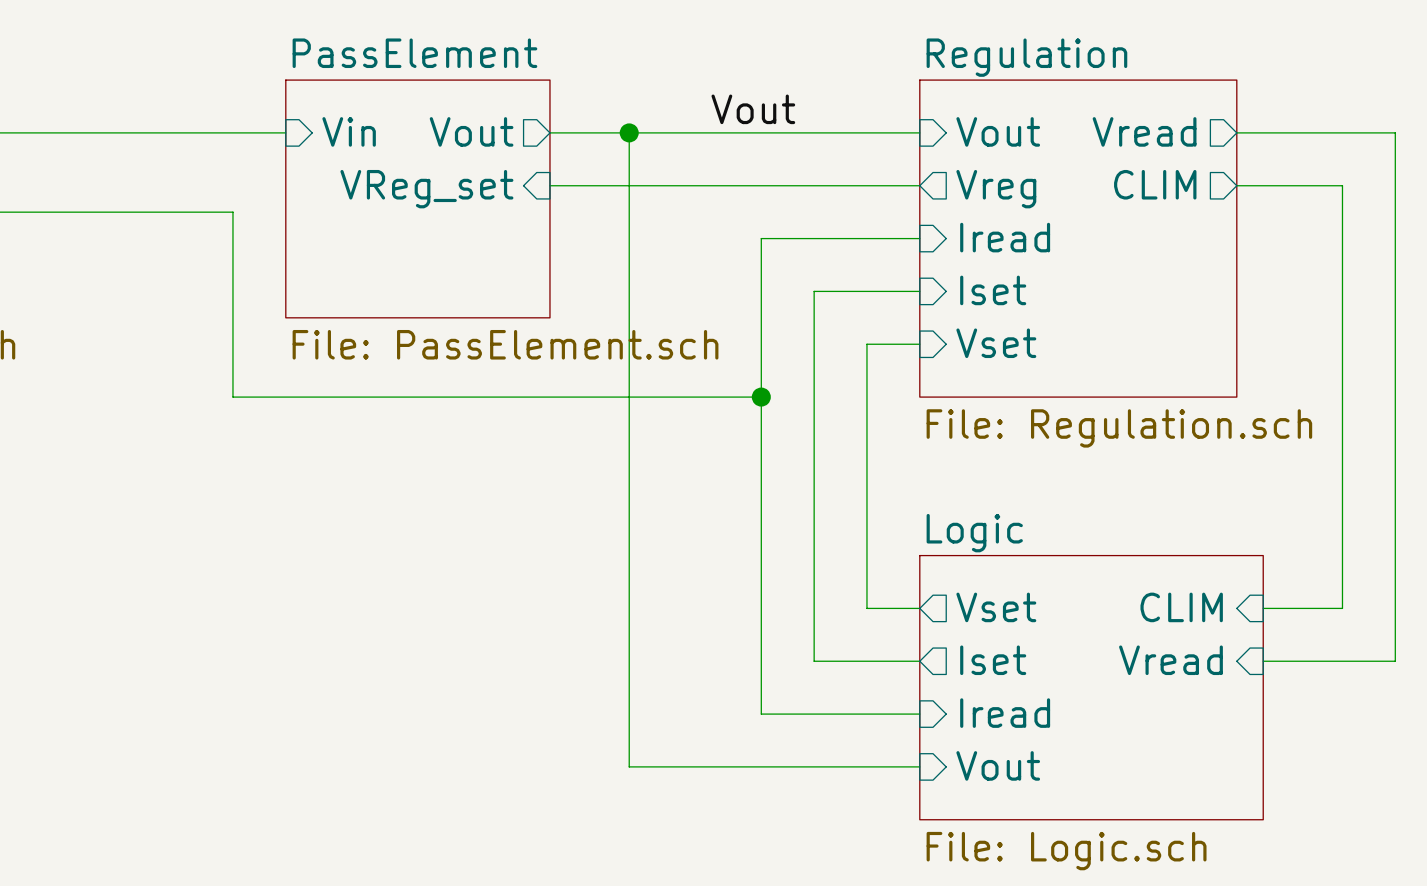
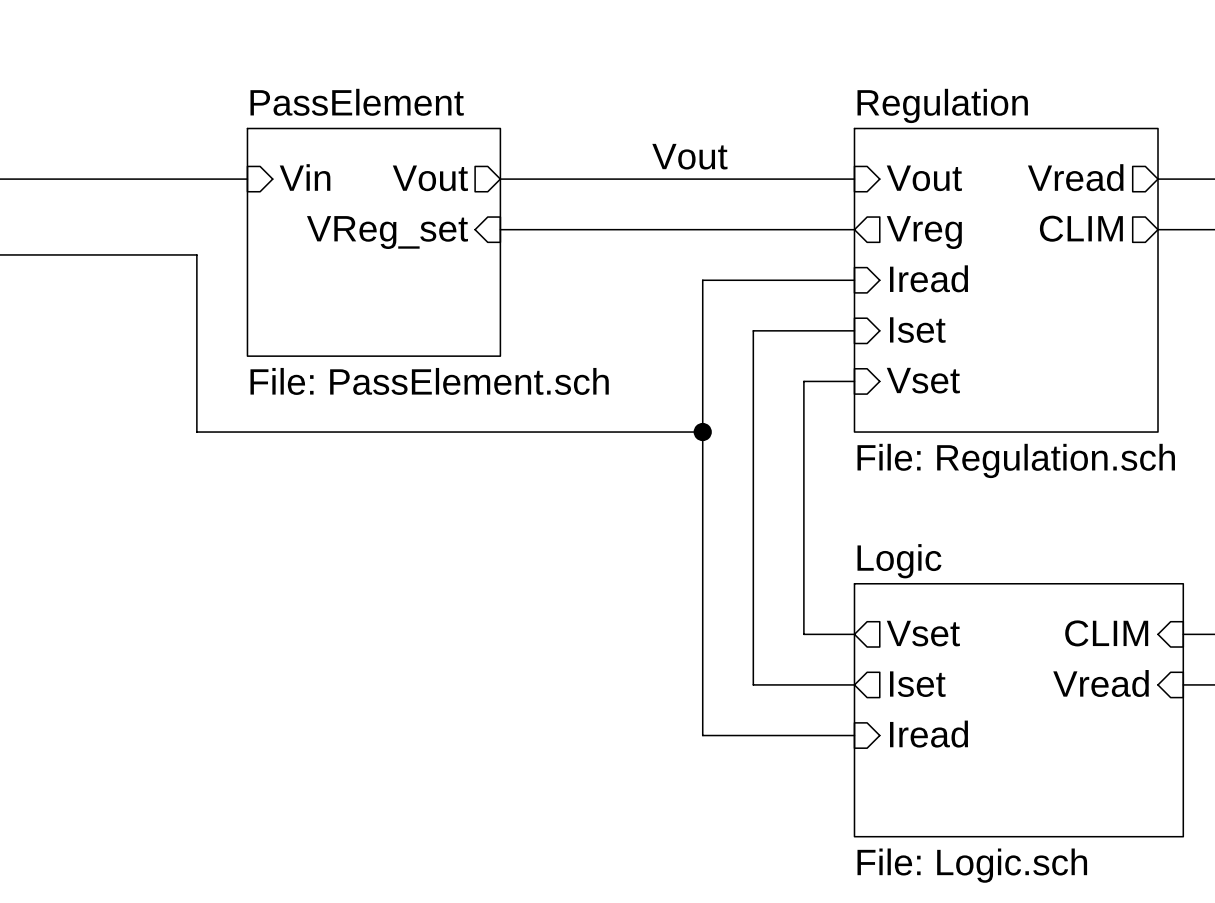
wire: (629, 132) (629, 766) (919, 766) -> none
junction: (629, 132) -> none
sheet pin: Vout (998, 765) -> none

